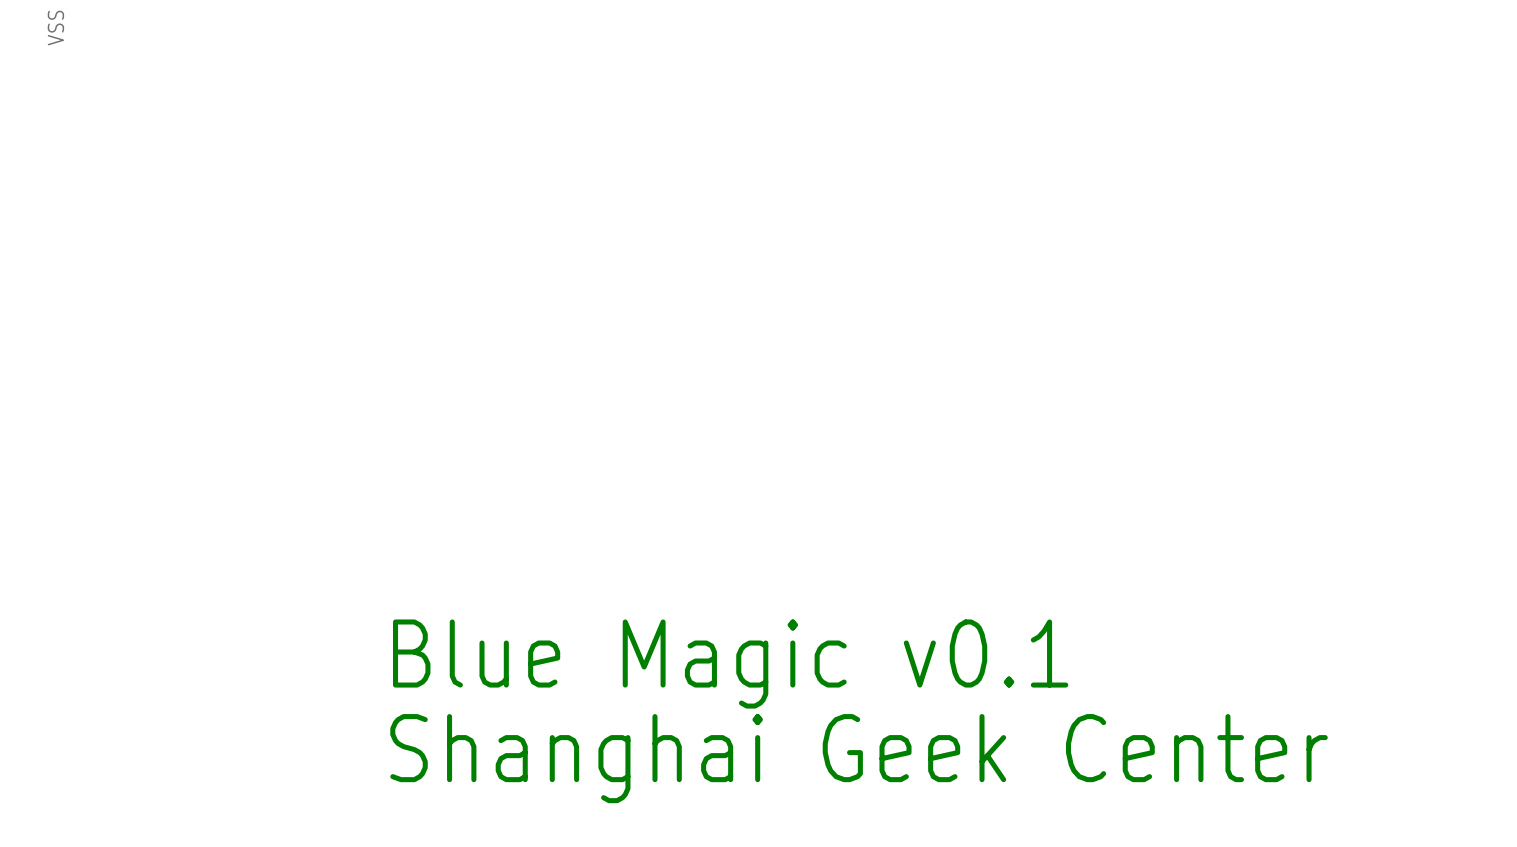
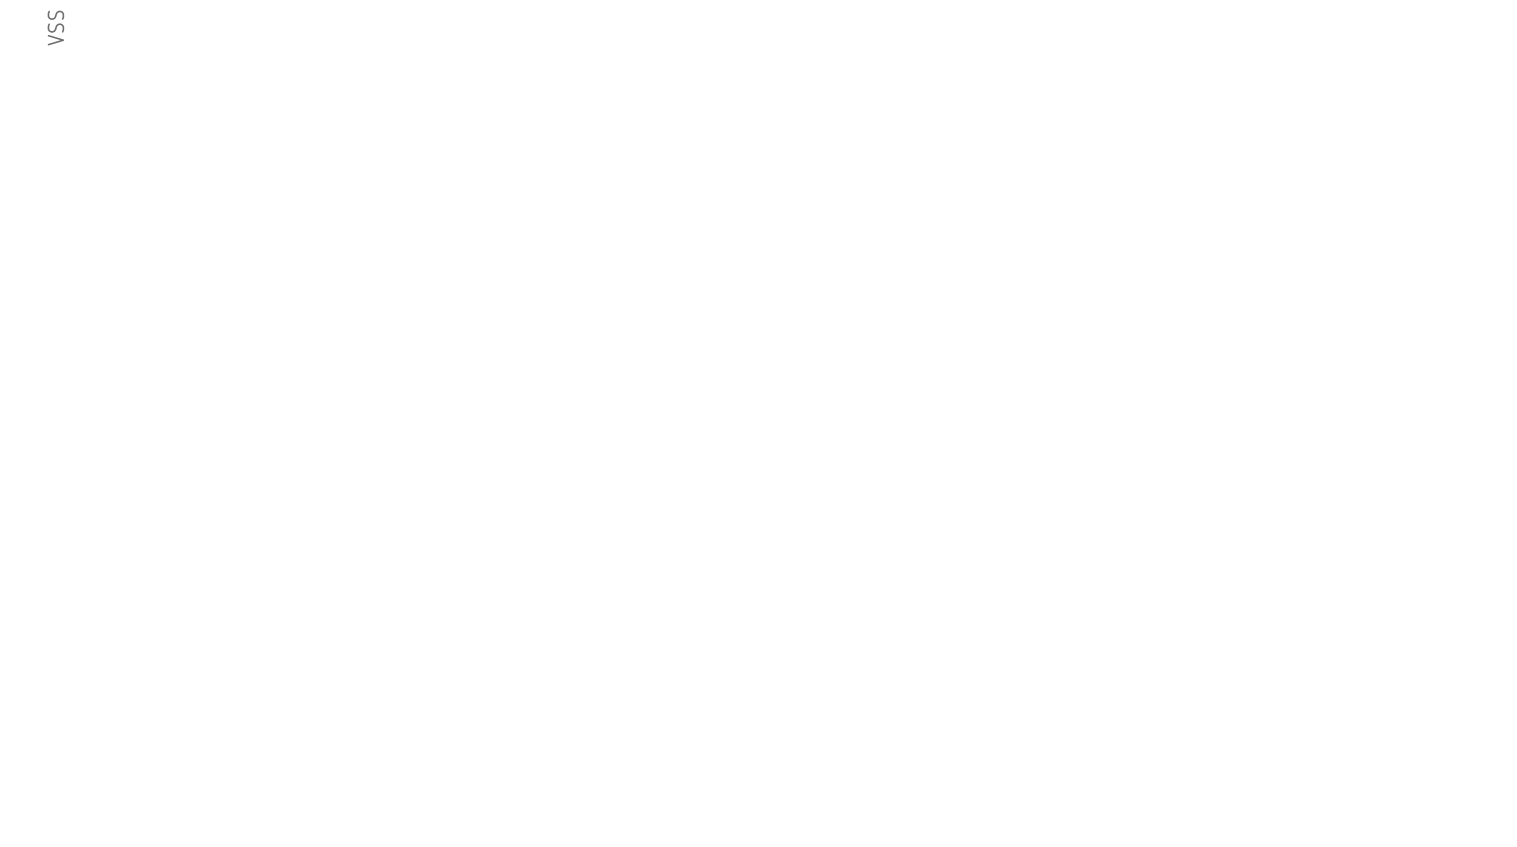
text: Blue Magic v0.1 (730, 664) -> none
text: Shanghai Geek Center (859, 758) -> none

